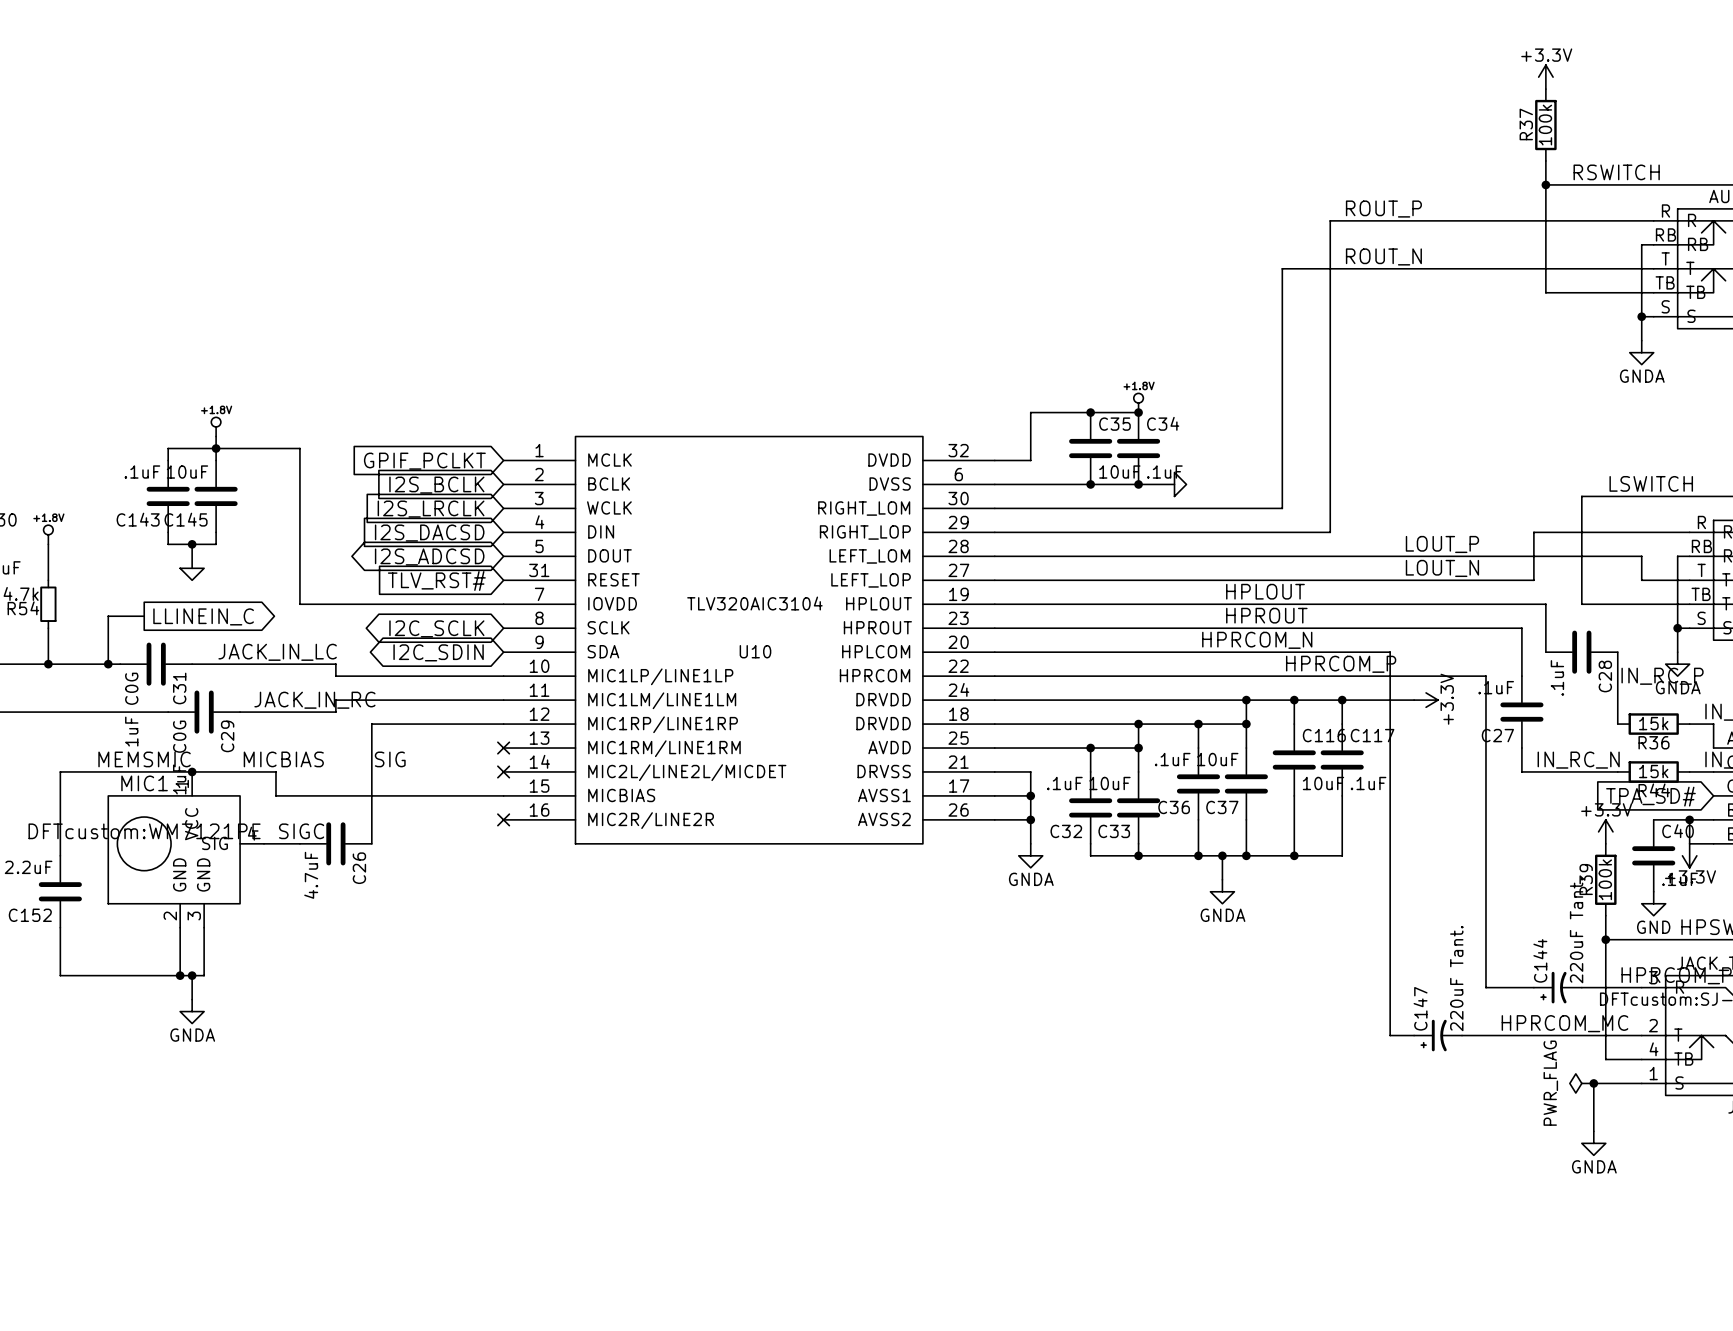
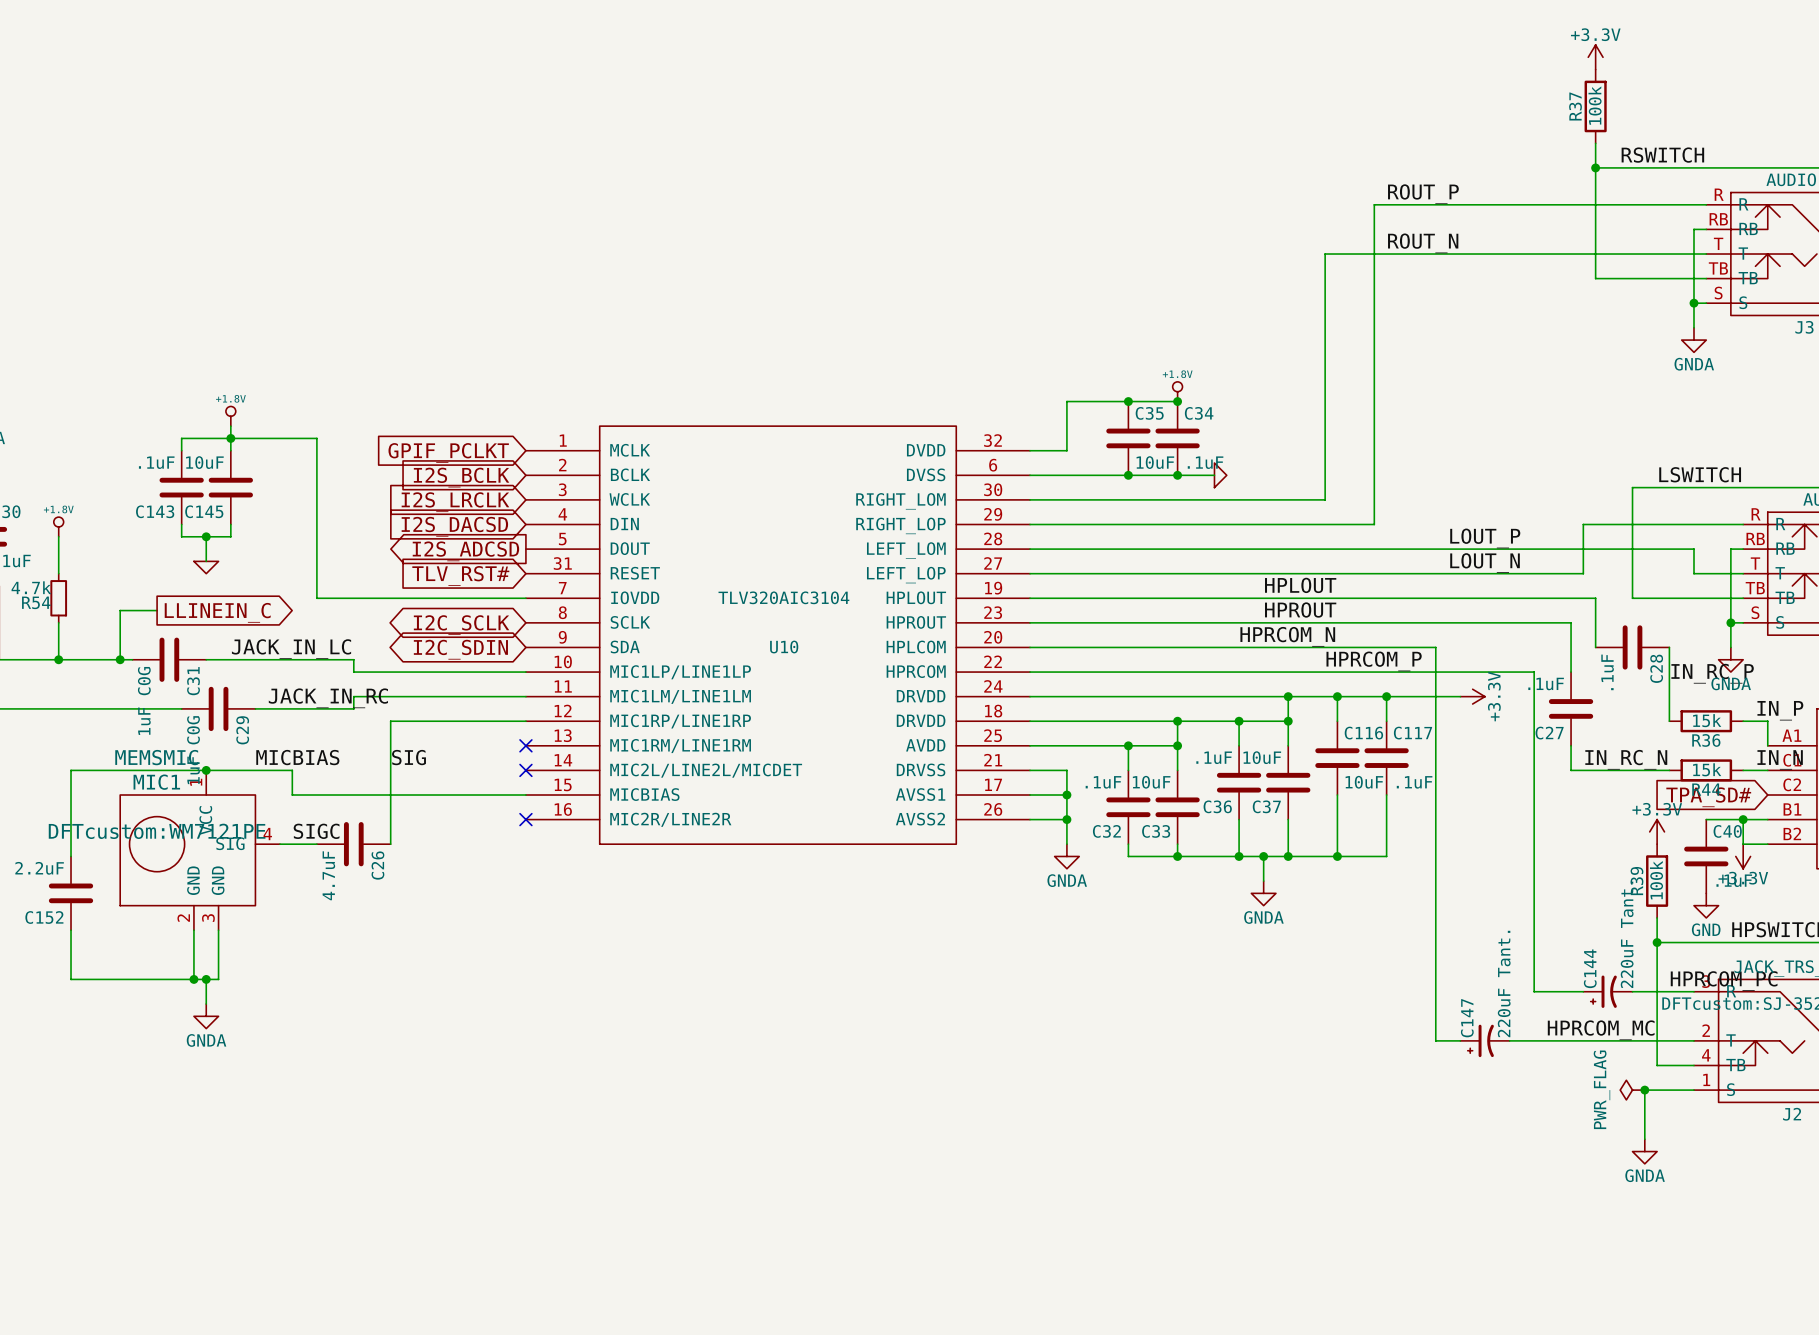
global label shape: bidirectional (429, 557) -> output (465, 551)

